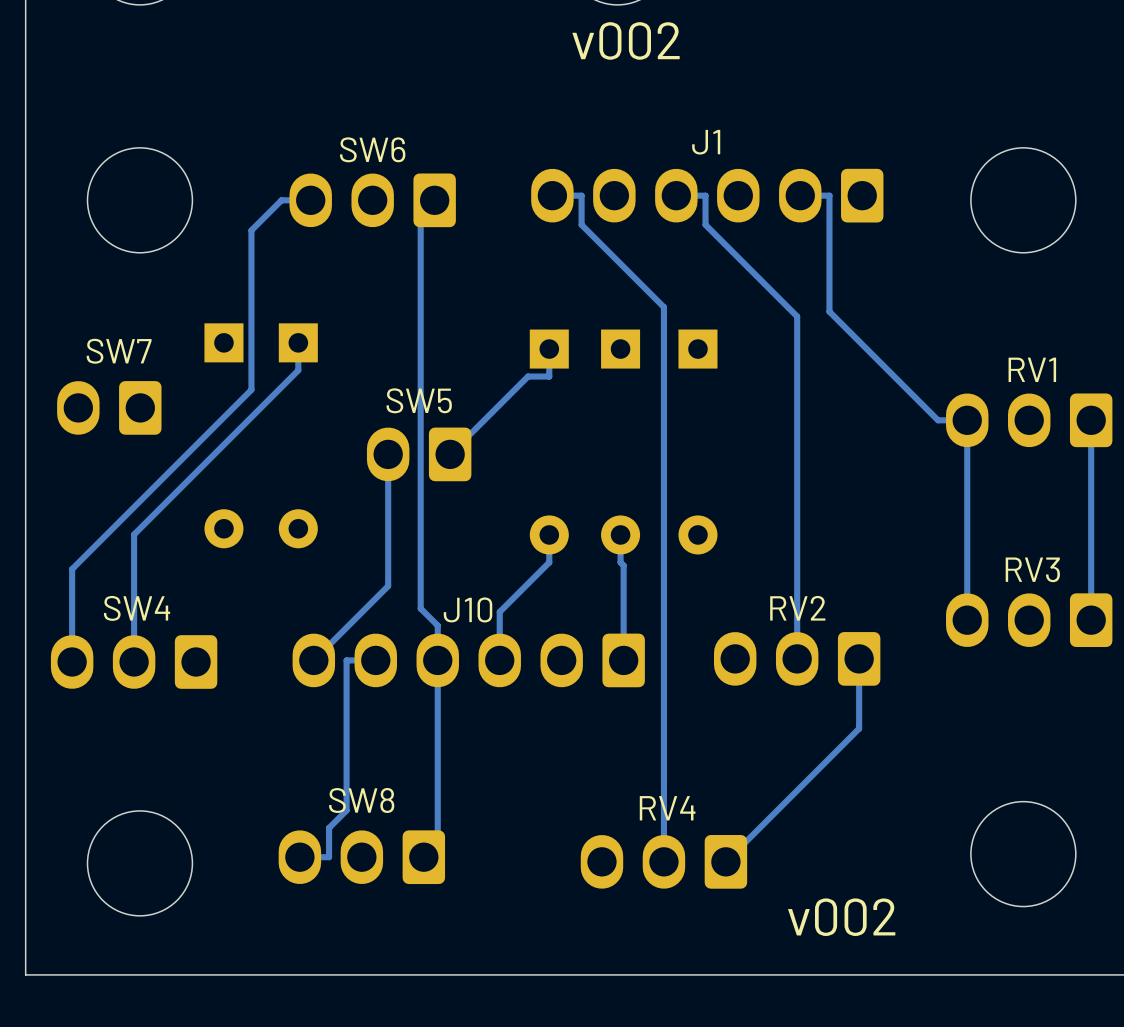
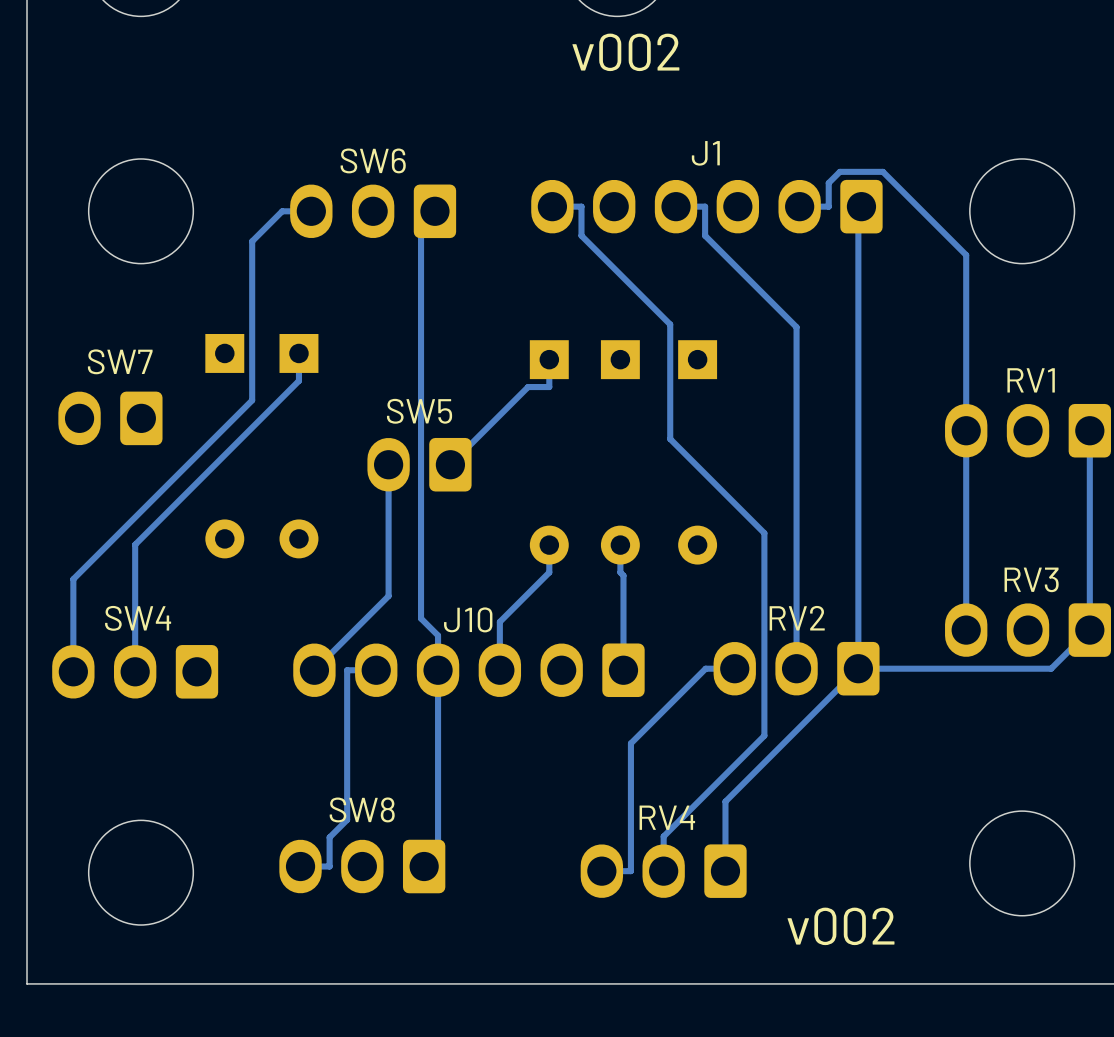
track: (829, 195) (829, 311) (938, 420) (967, 420) -> (828, 206) (828, 183) (839, 171) (882, 171) (966, 255) (966, 430)
track: none -> (861, 206) (858, 209) (858, 668)
track: (663, 307) (663, 827) -> (663, 317) (670, 324) (670, 439) (764, 533) (764, 735) (663, 836)
track: none -> (1089, 630) (1051, 668) (858, 668)
track: none -> (734, 668) (705, 668) (630, 743) (630, 871) (601, 871)
track: (859, 658) (859, 728) (725, 861) -> (858, 668) (725, 801) (725, 871)

